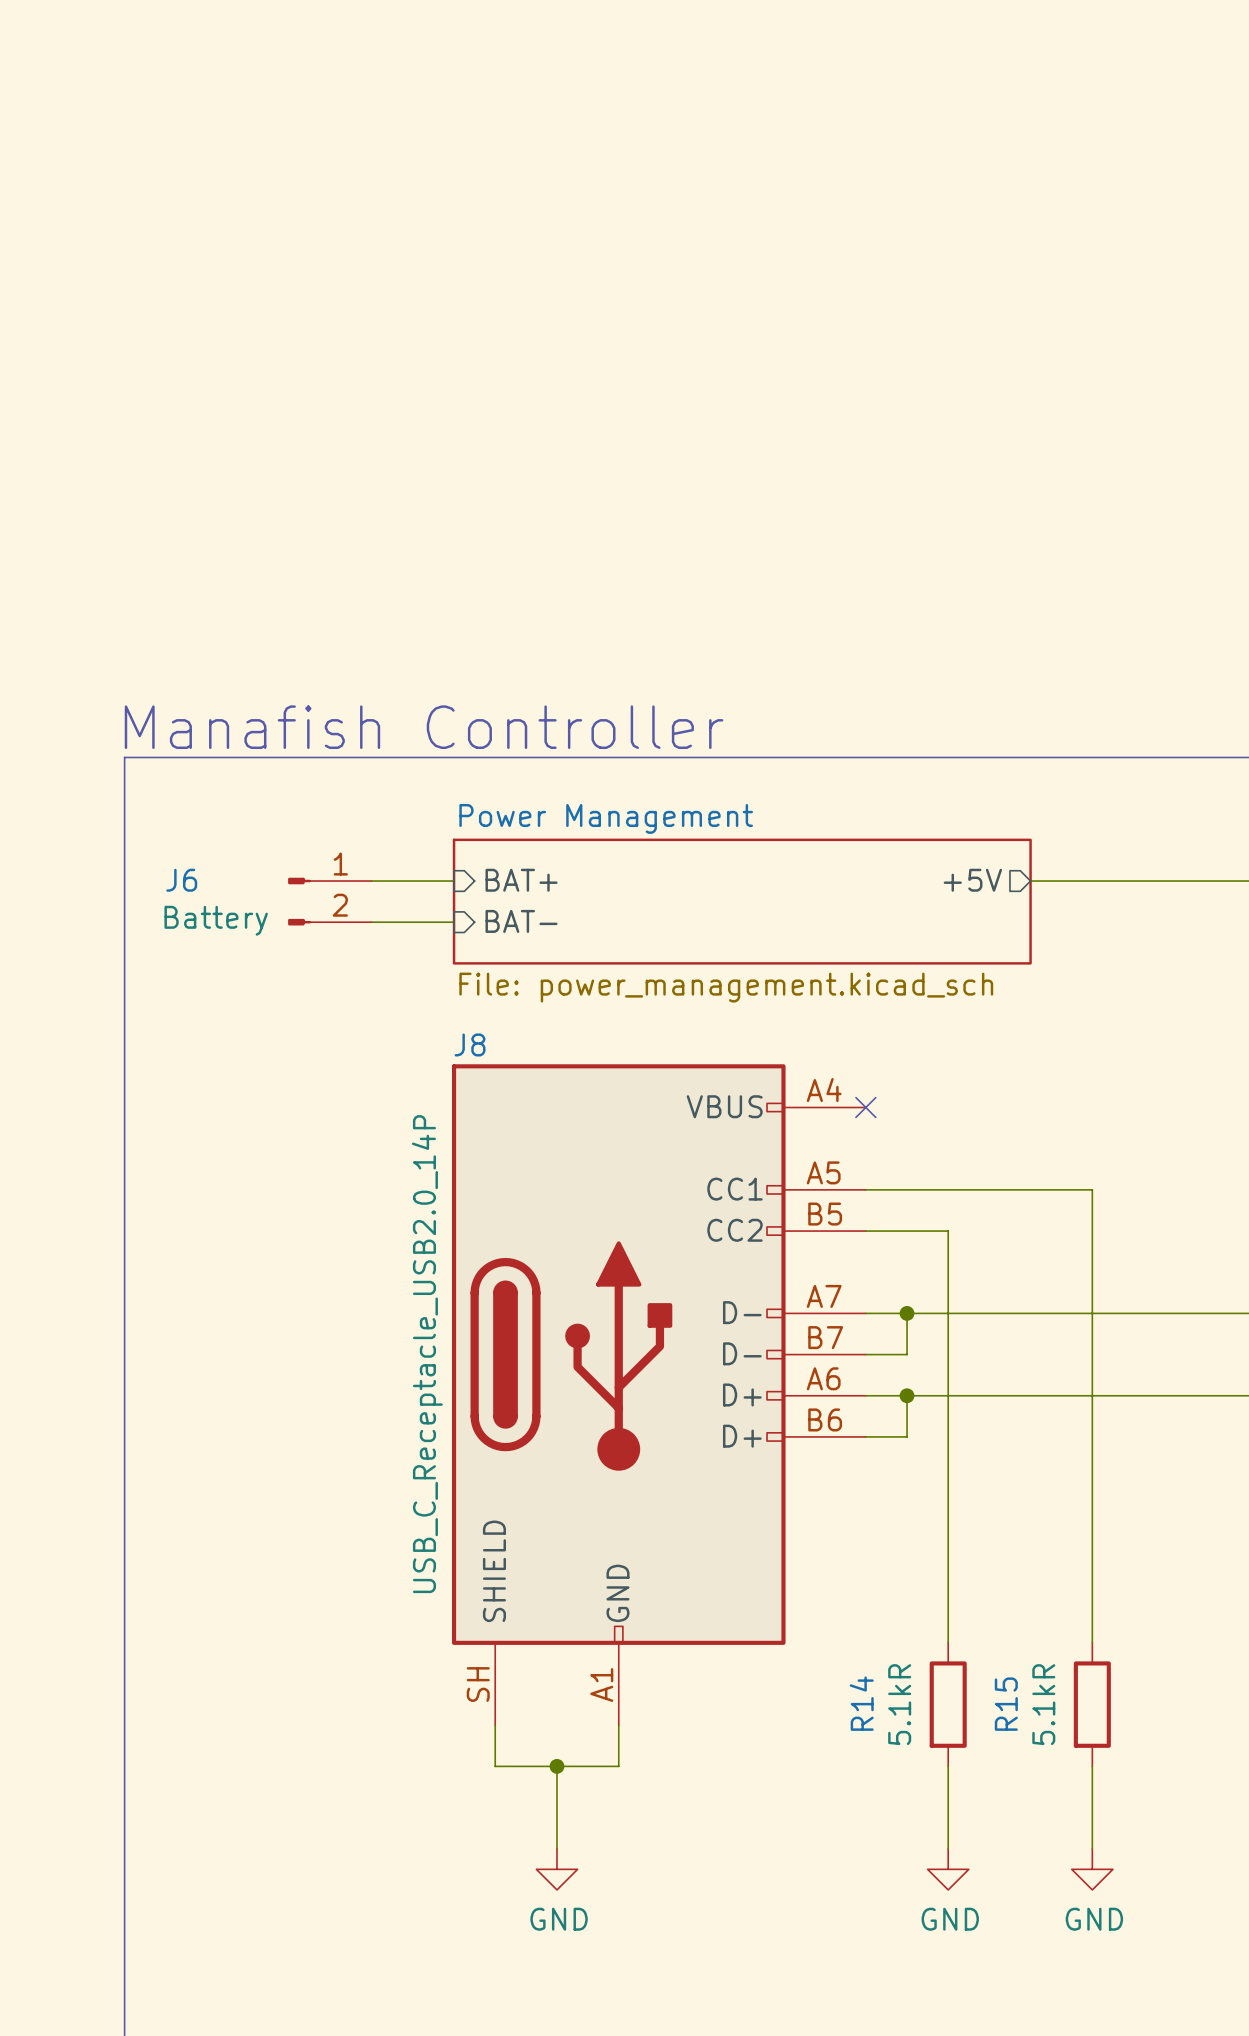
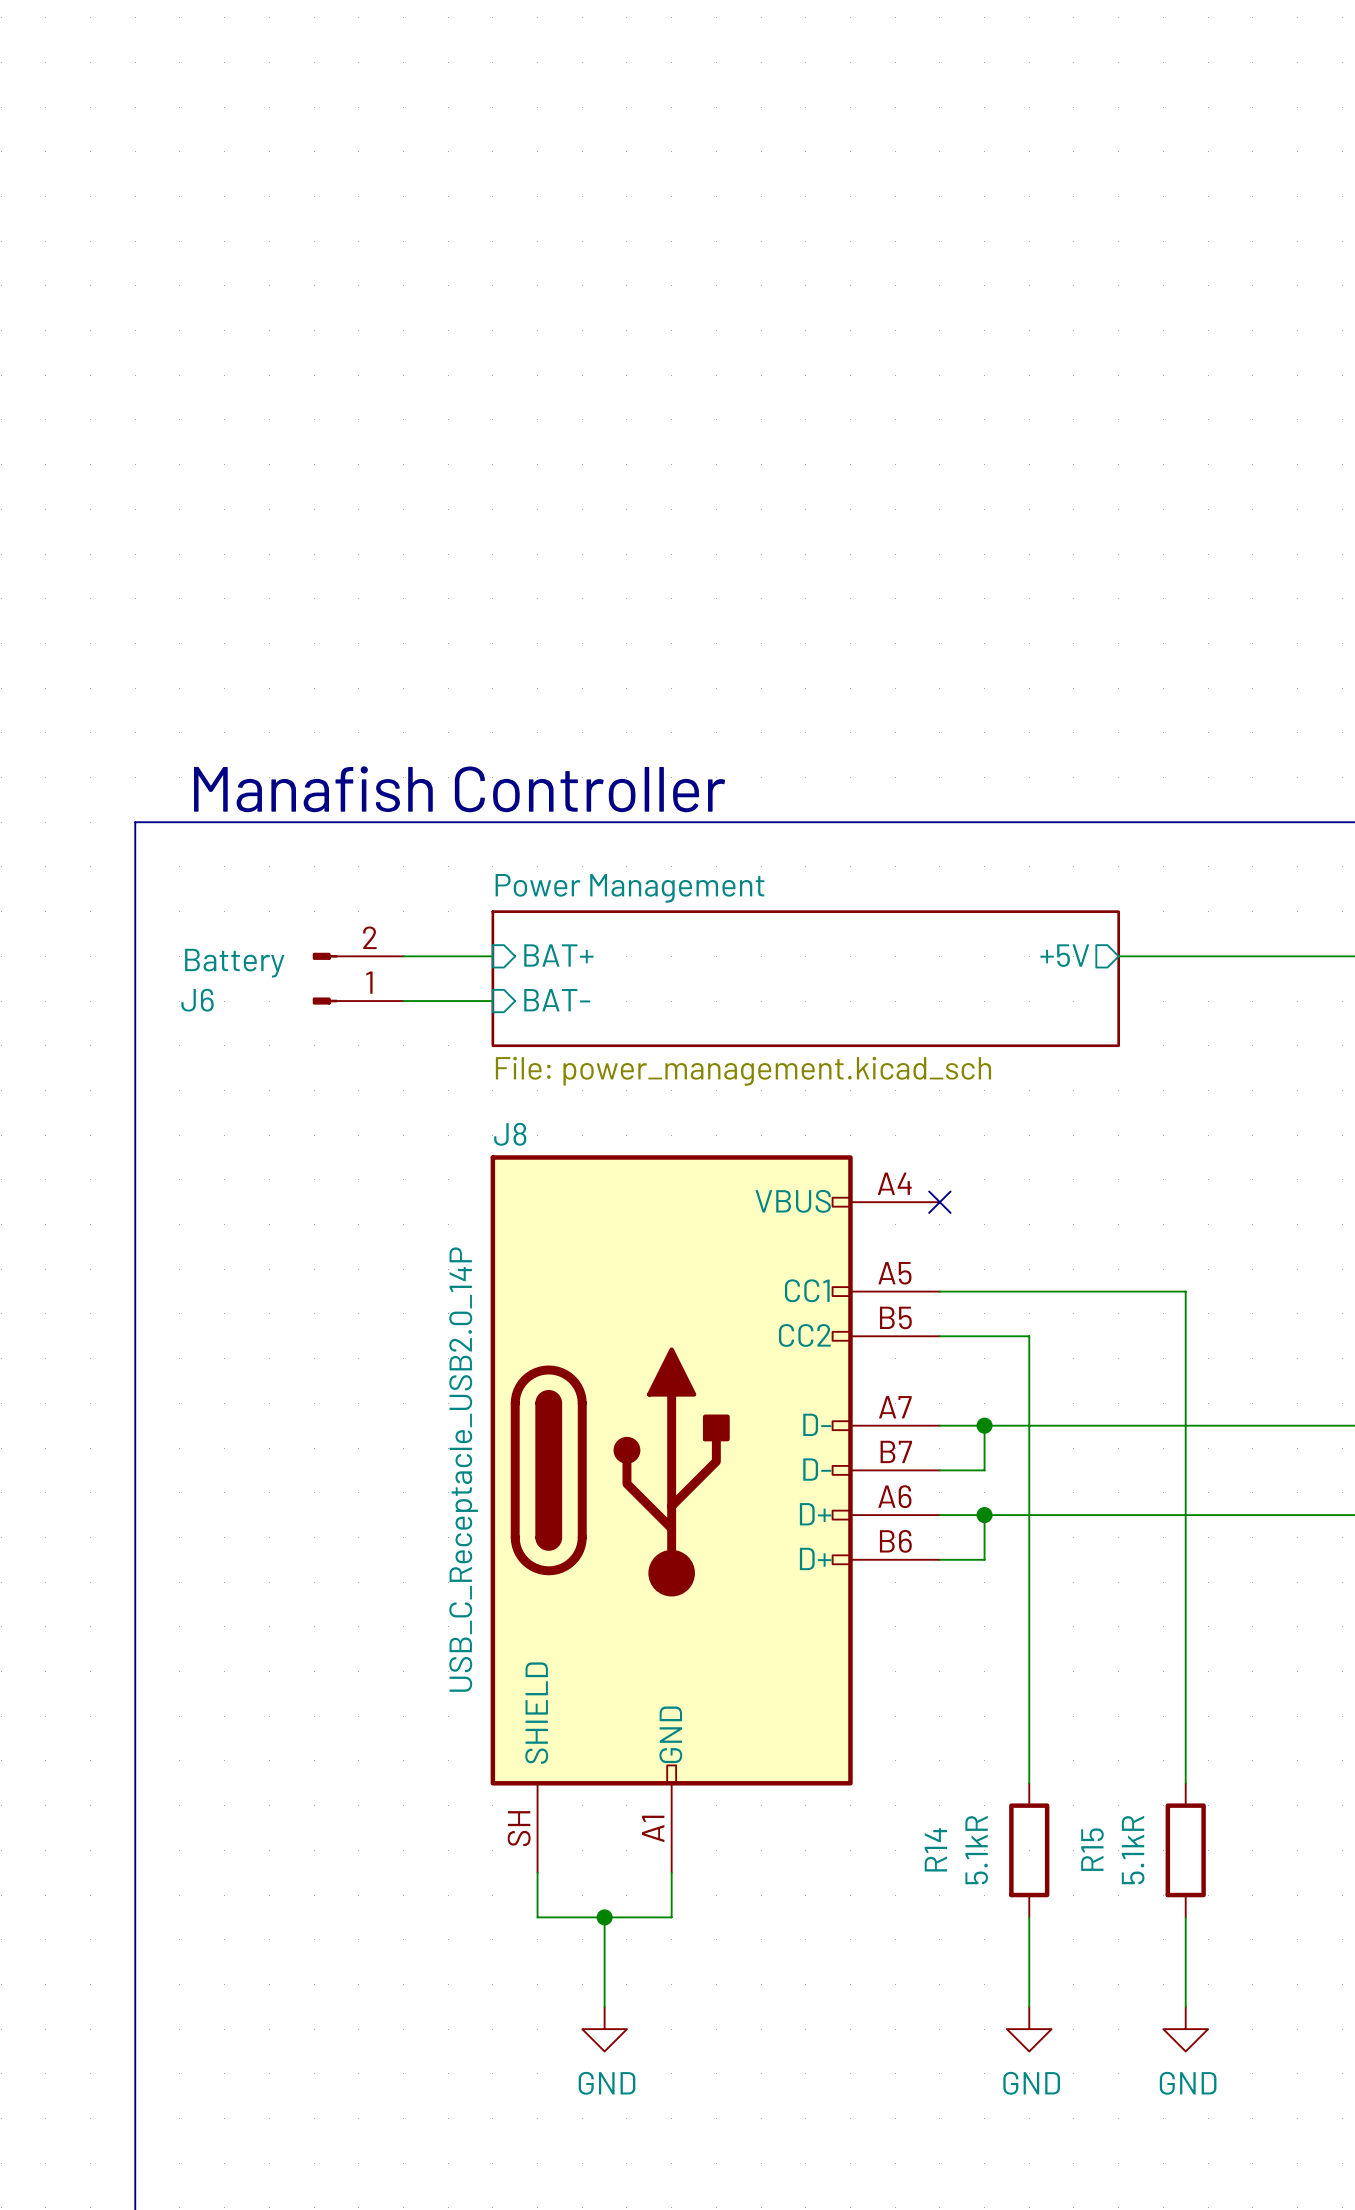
J6 flip: as is (299, 901) -> up-down (325, 978)

